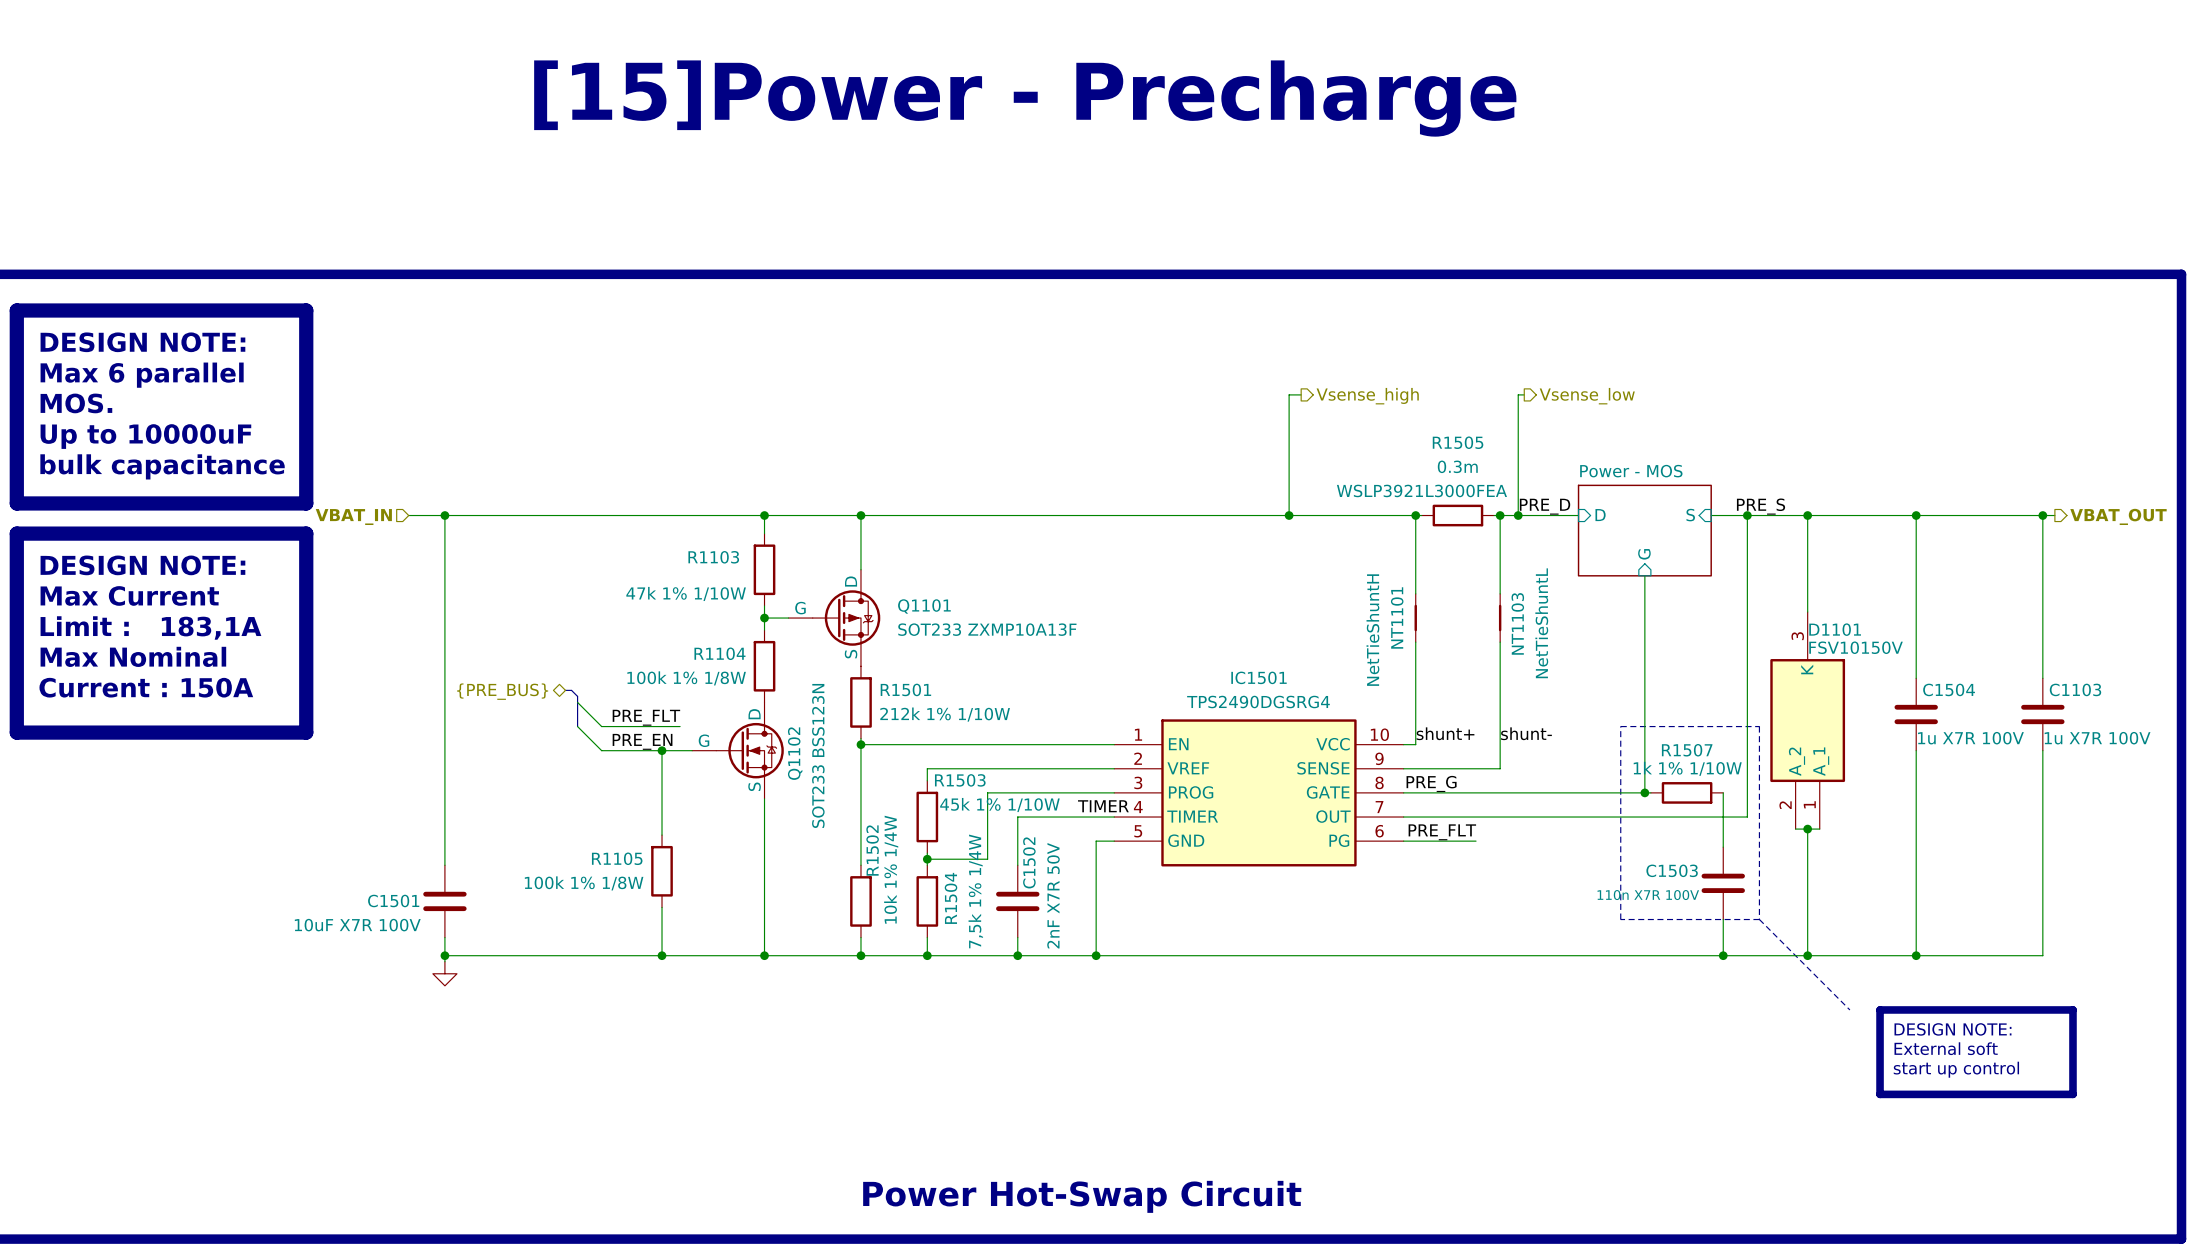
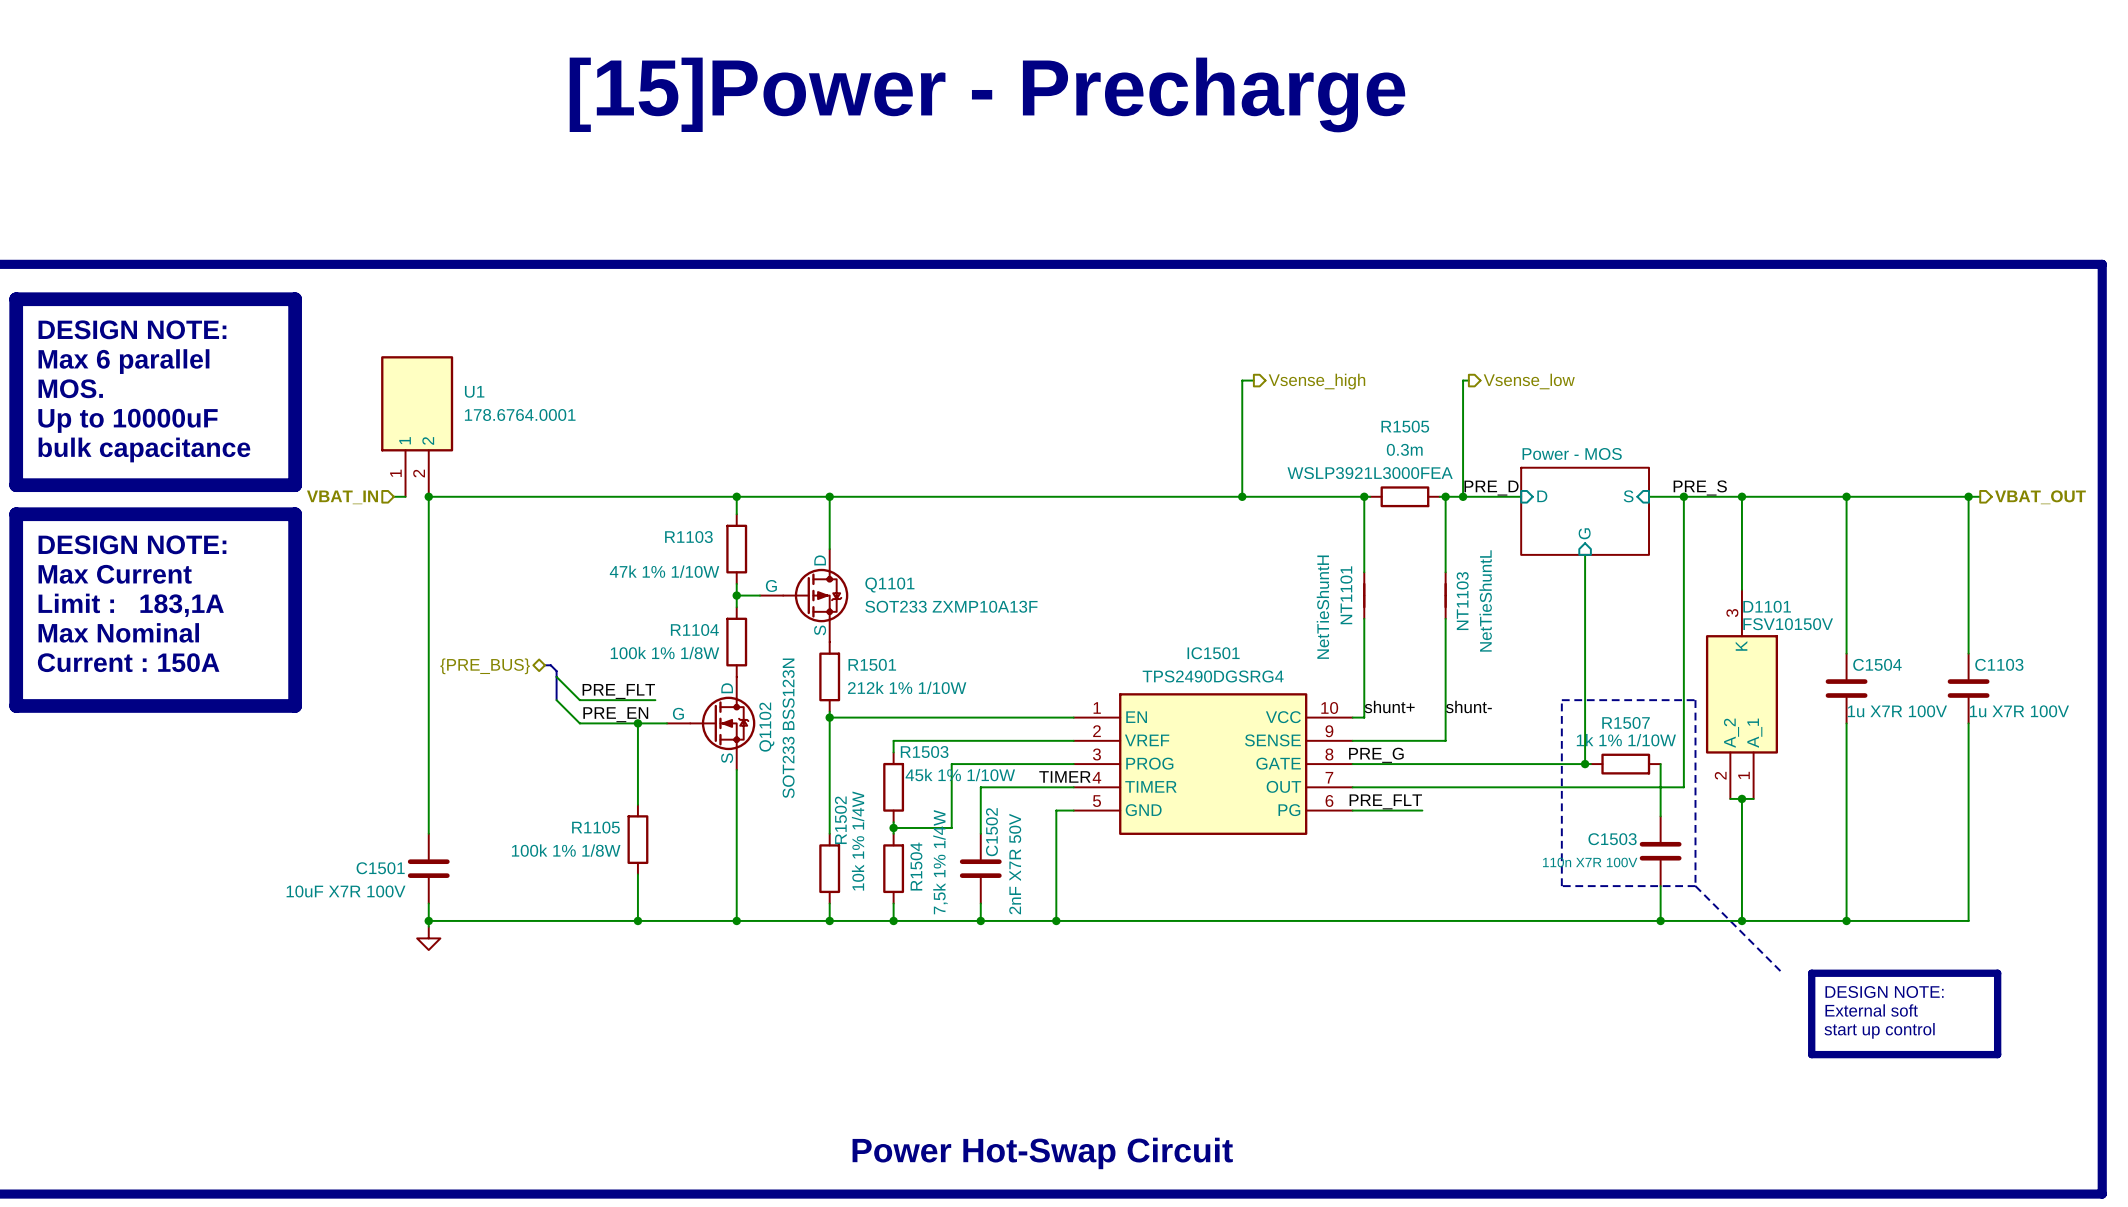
U1: none -> 178.6764.0001 (417, 426)
wire: (420, 515) (444, 515) -> none

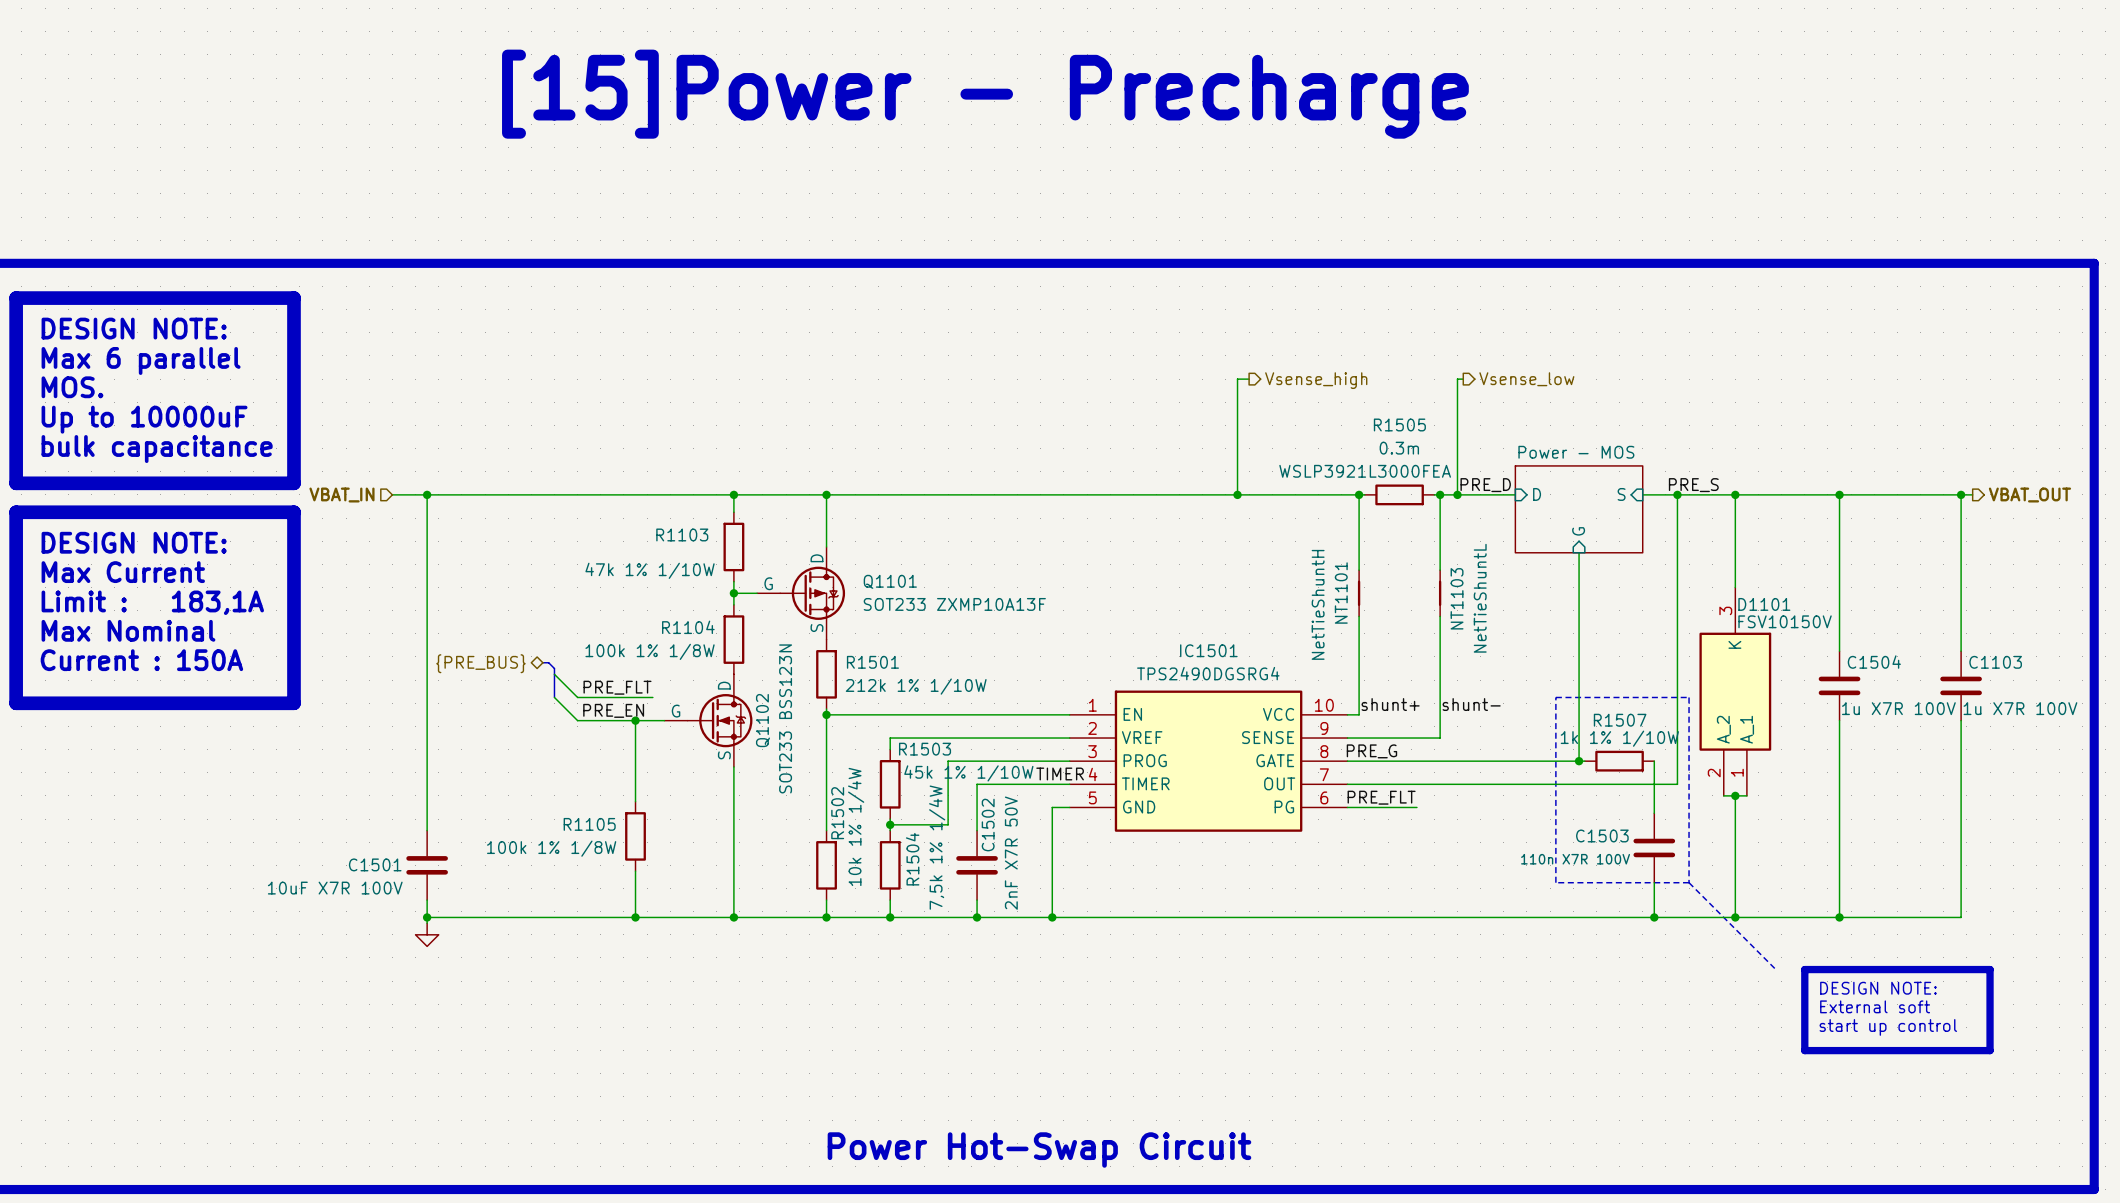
U1: 178.6764.0001 (417, 426) -> none
wire: none -> (403, 494) (427, 494)

